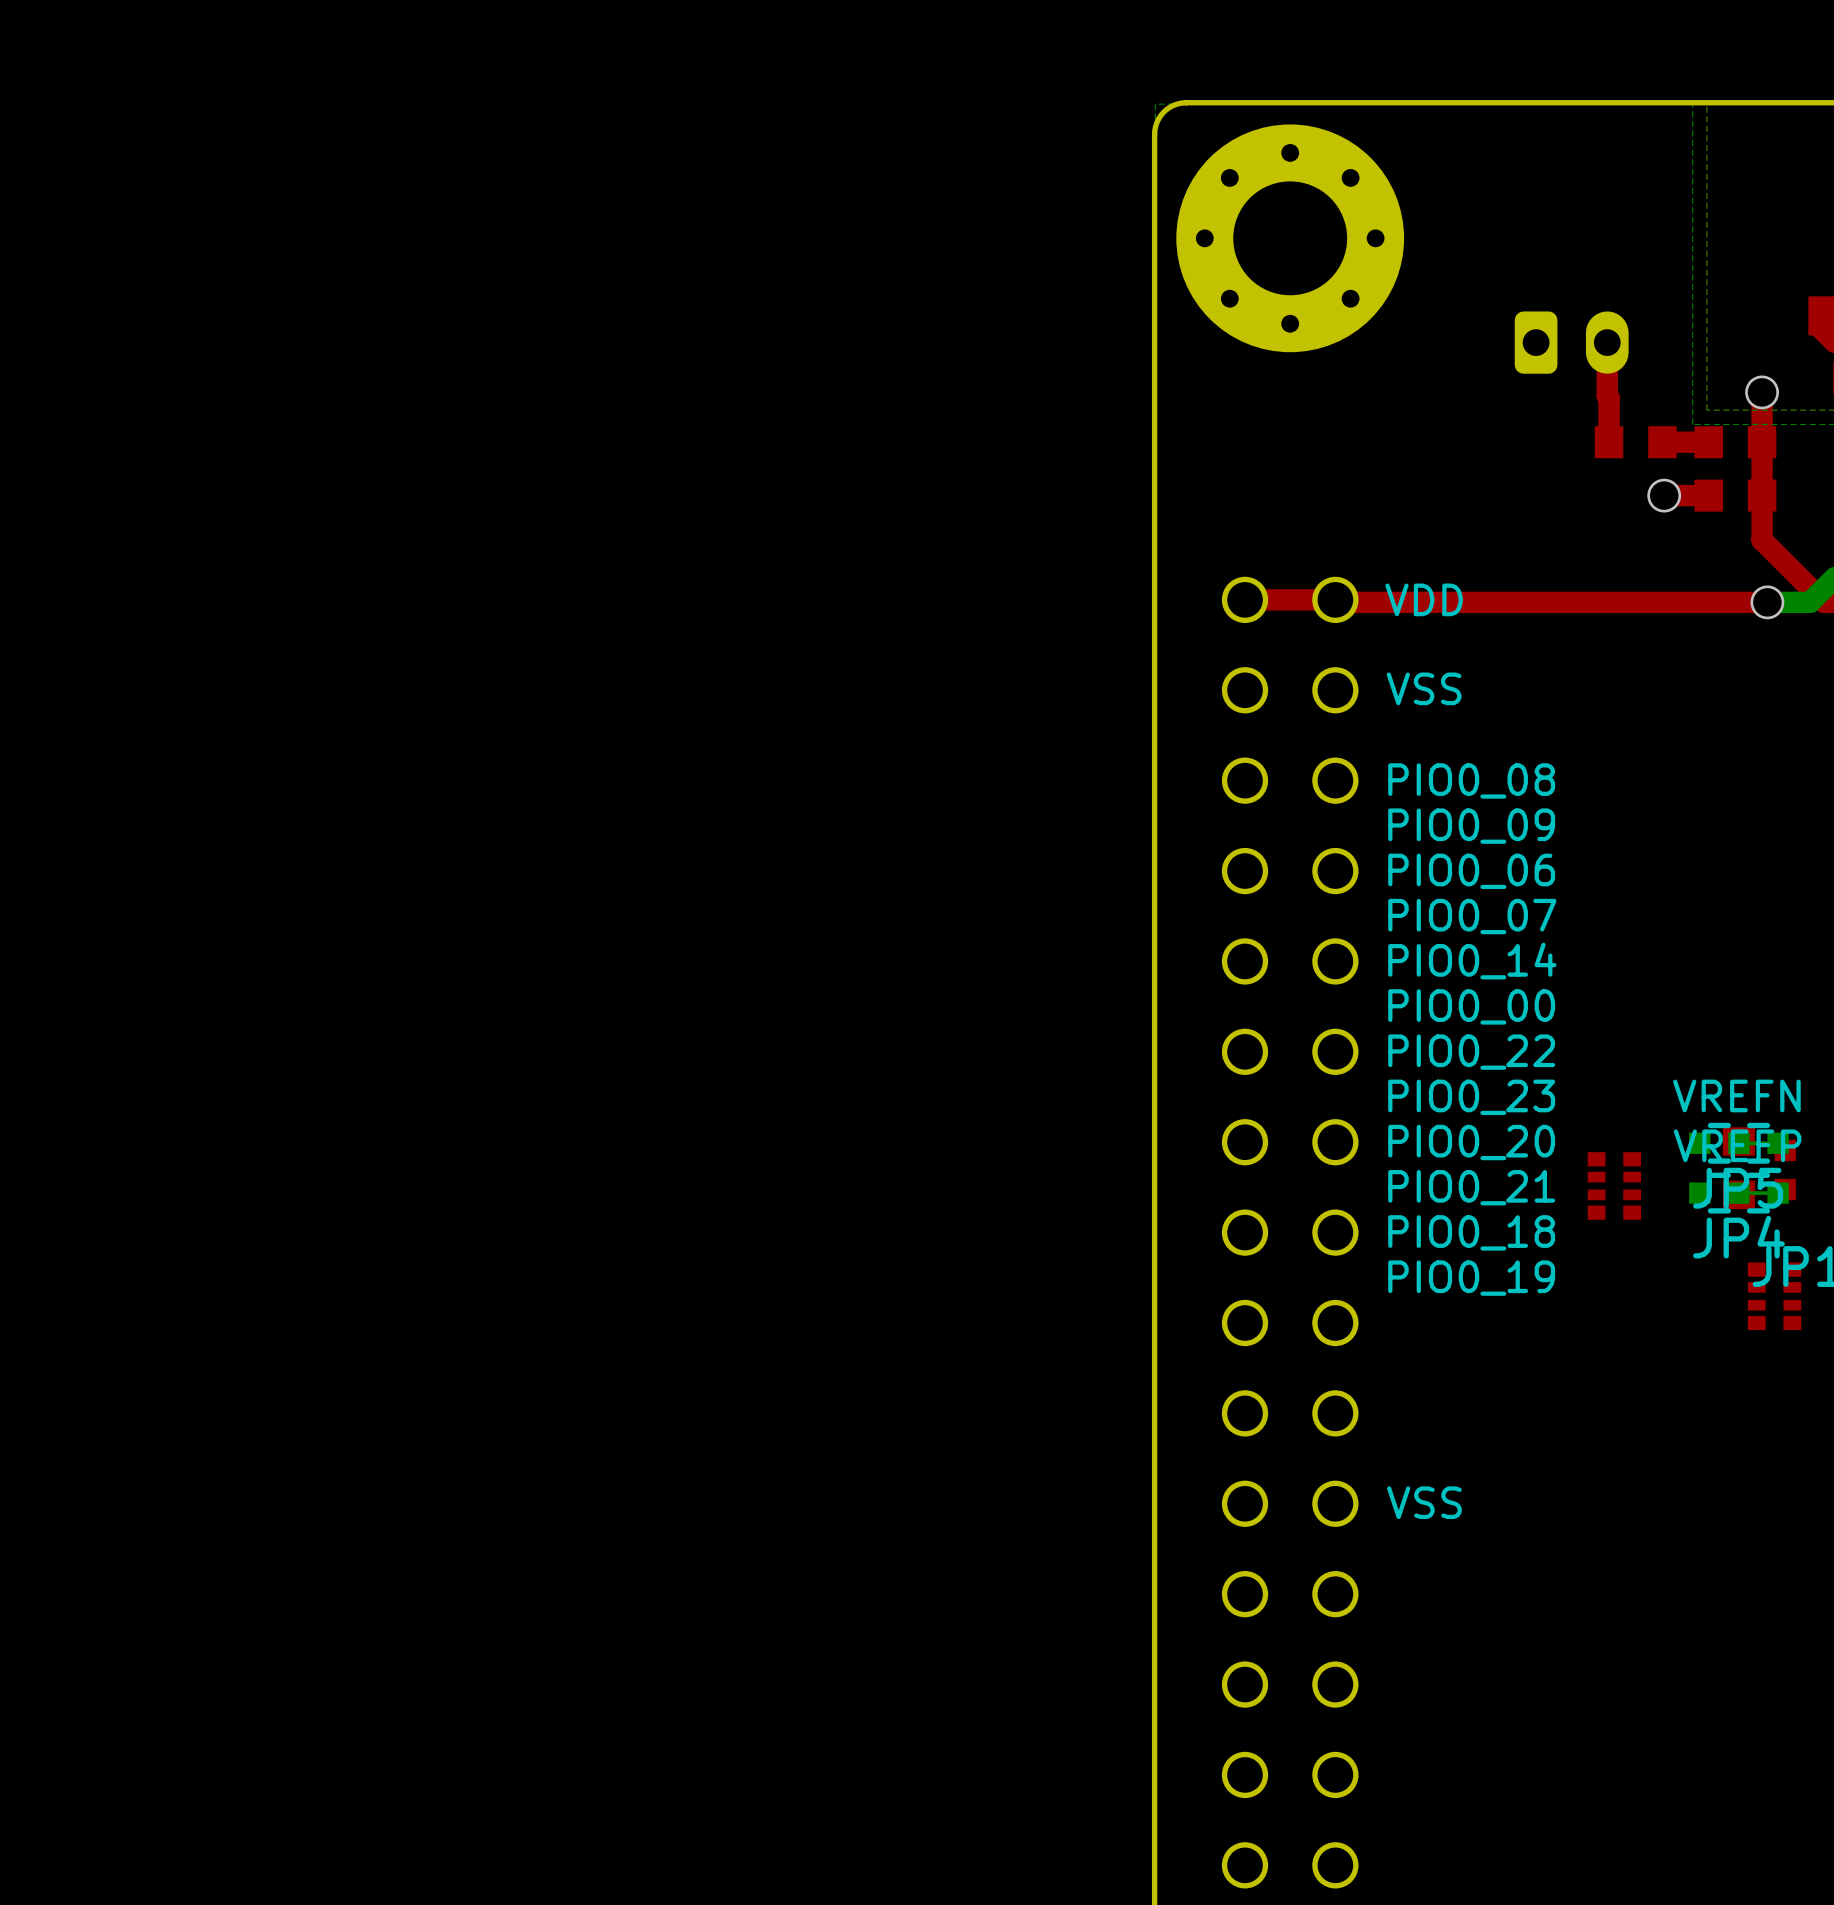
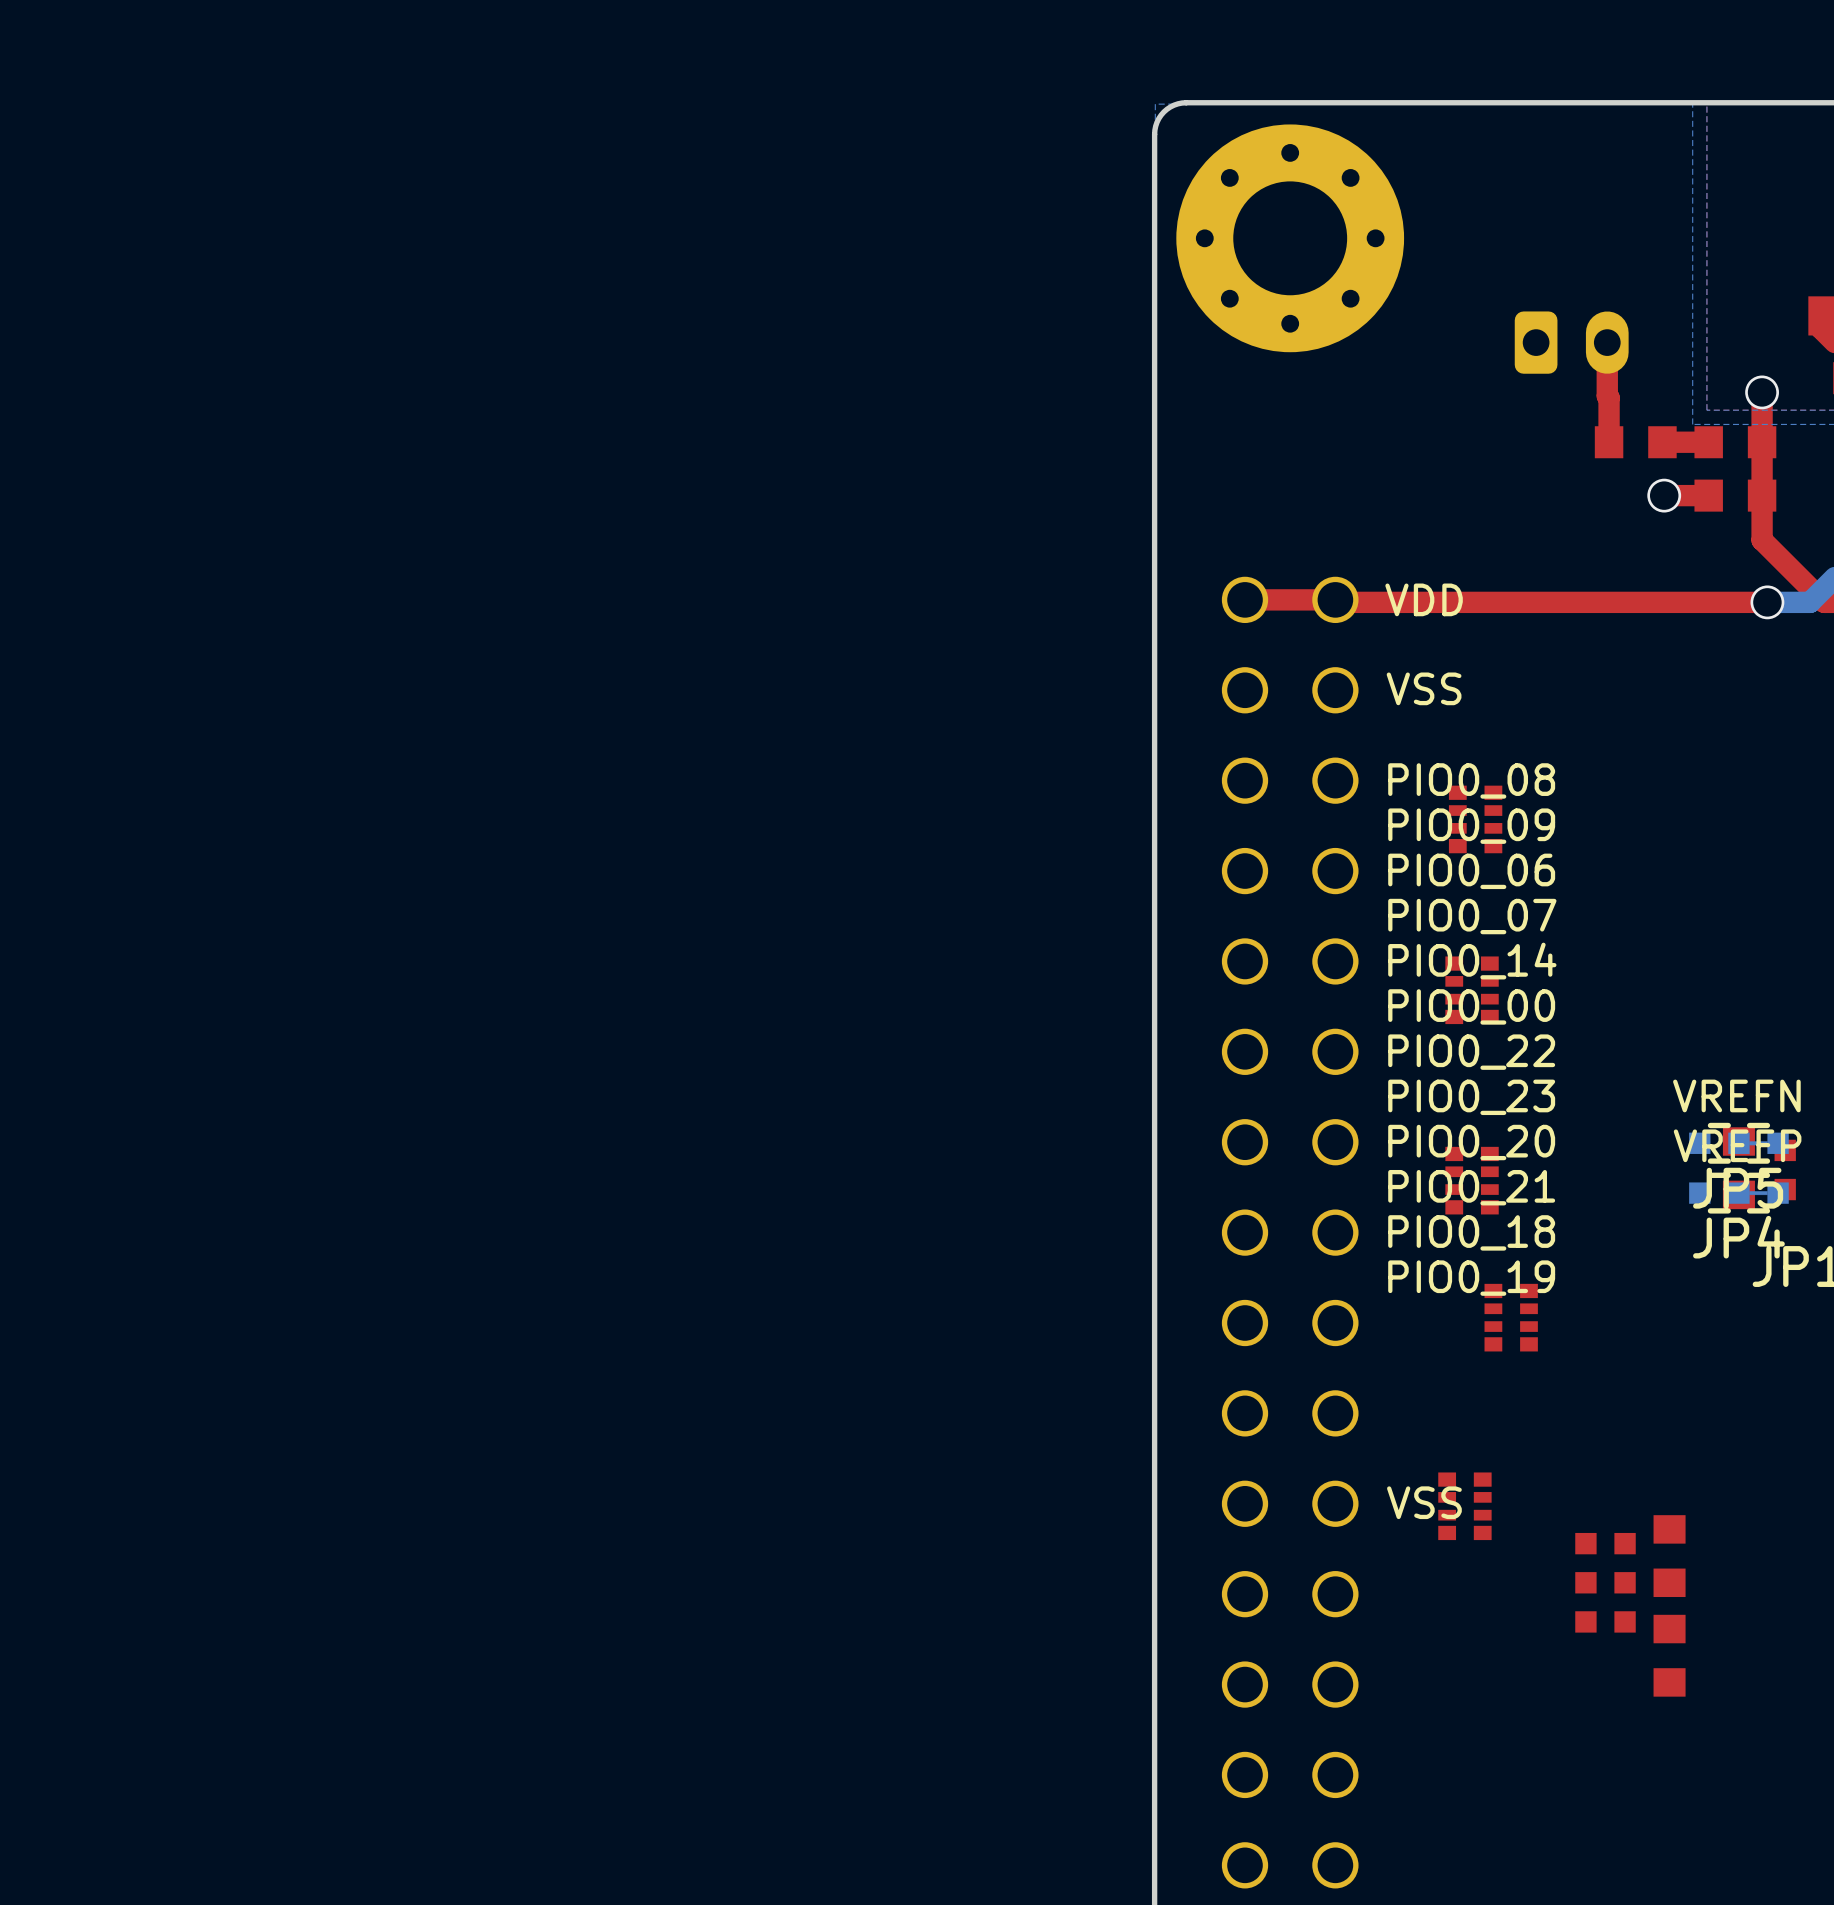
part: none -> (1475, 819)
part: none -> (1472, 990)
part: none -> (1472, 1180)
part: (1614, 1185) -> none
part: (1774, 1296) -> none
part: none -> (1511, 1317)
part: none -> (1464, 1506)
part: none -> (1605, 1543)
part: none -> (1669, 1556)
part: none -> (1605, 1582)
part: none -> (1605, 1621)
part: none -> (1669, 1655)

